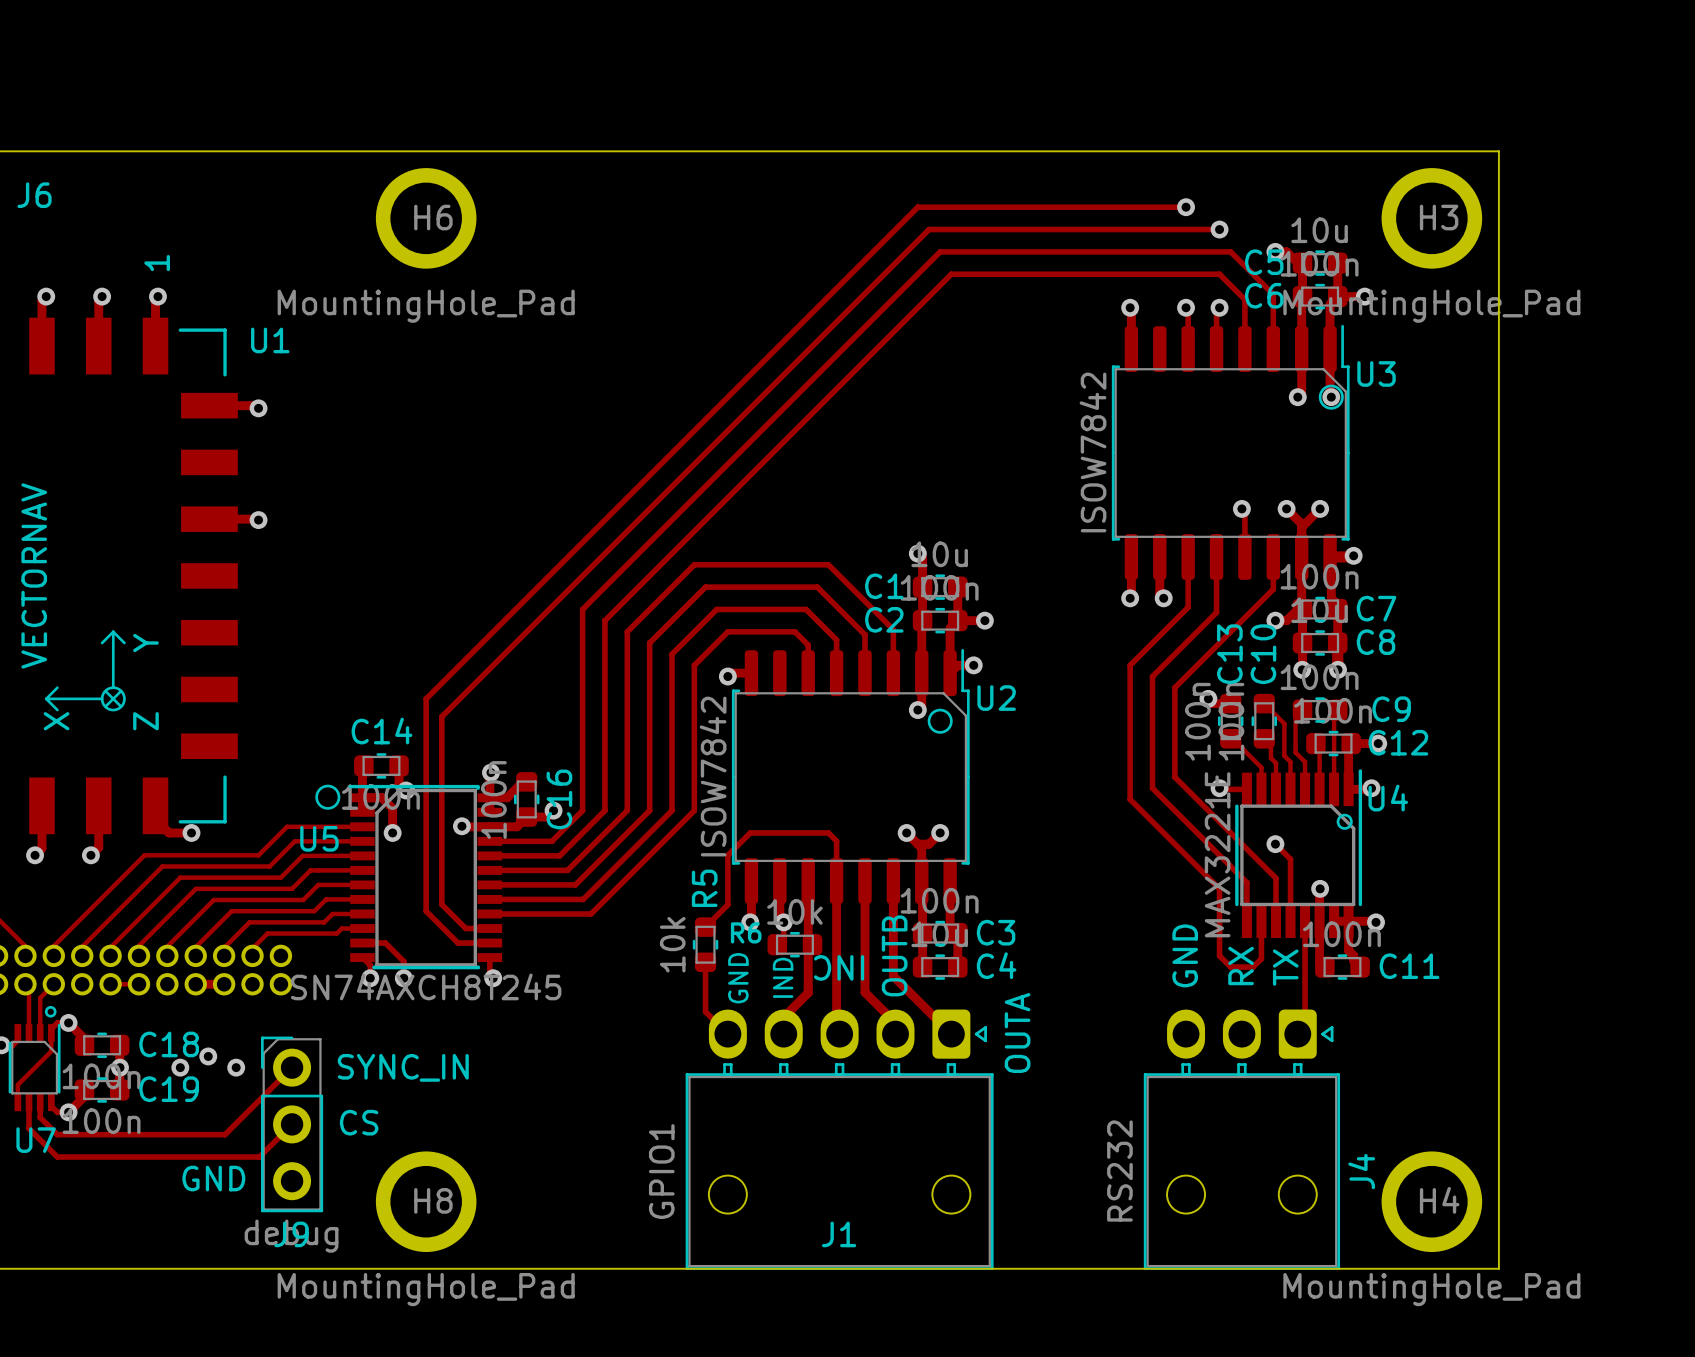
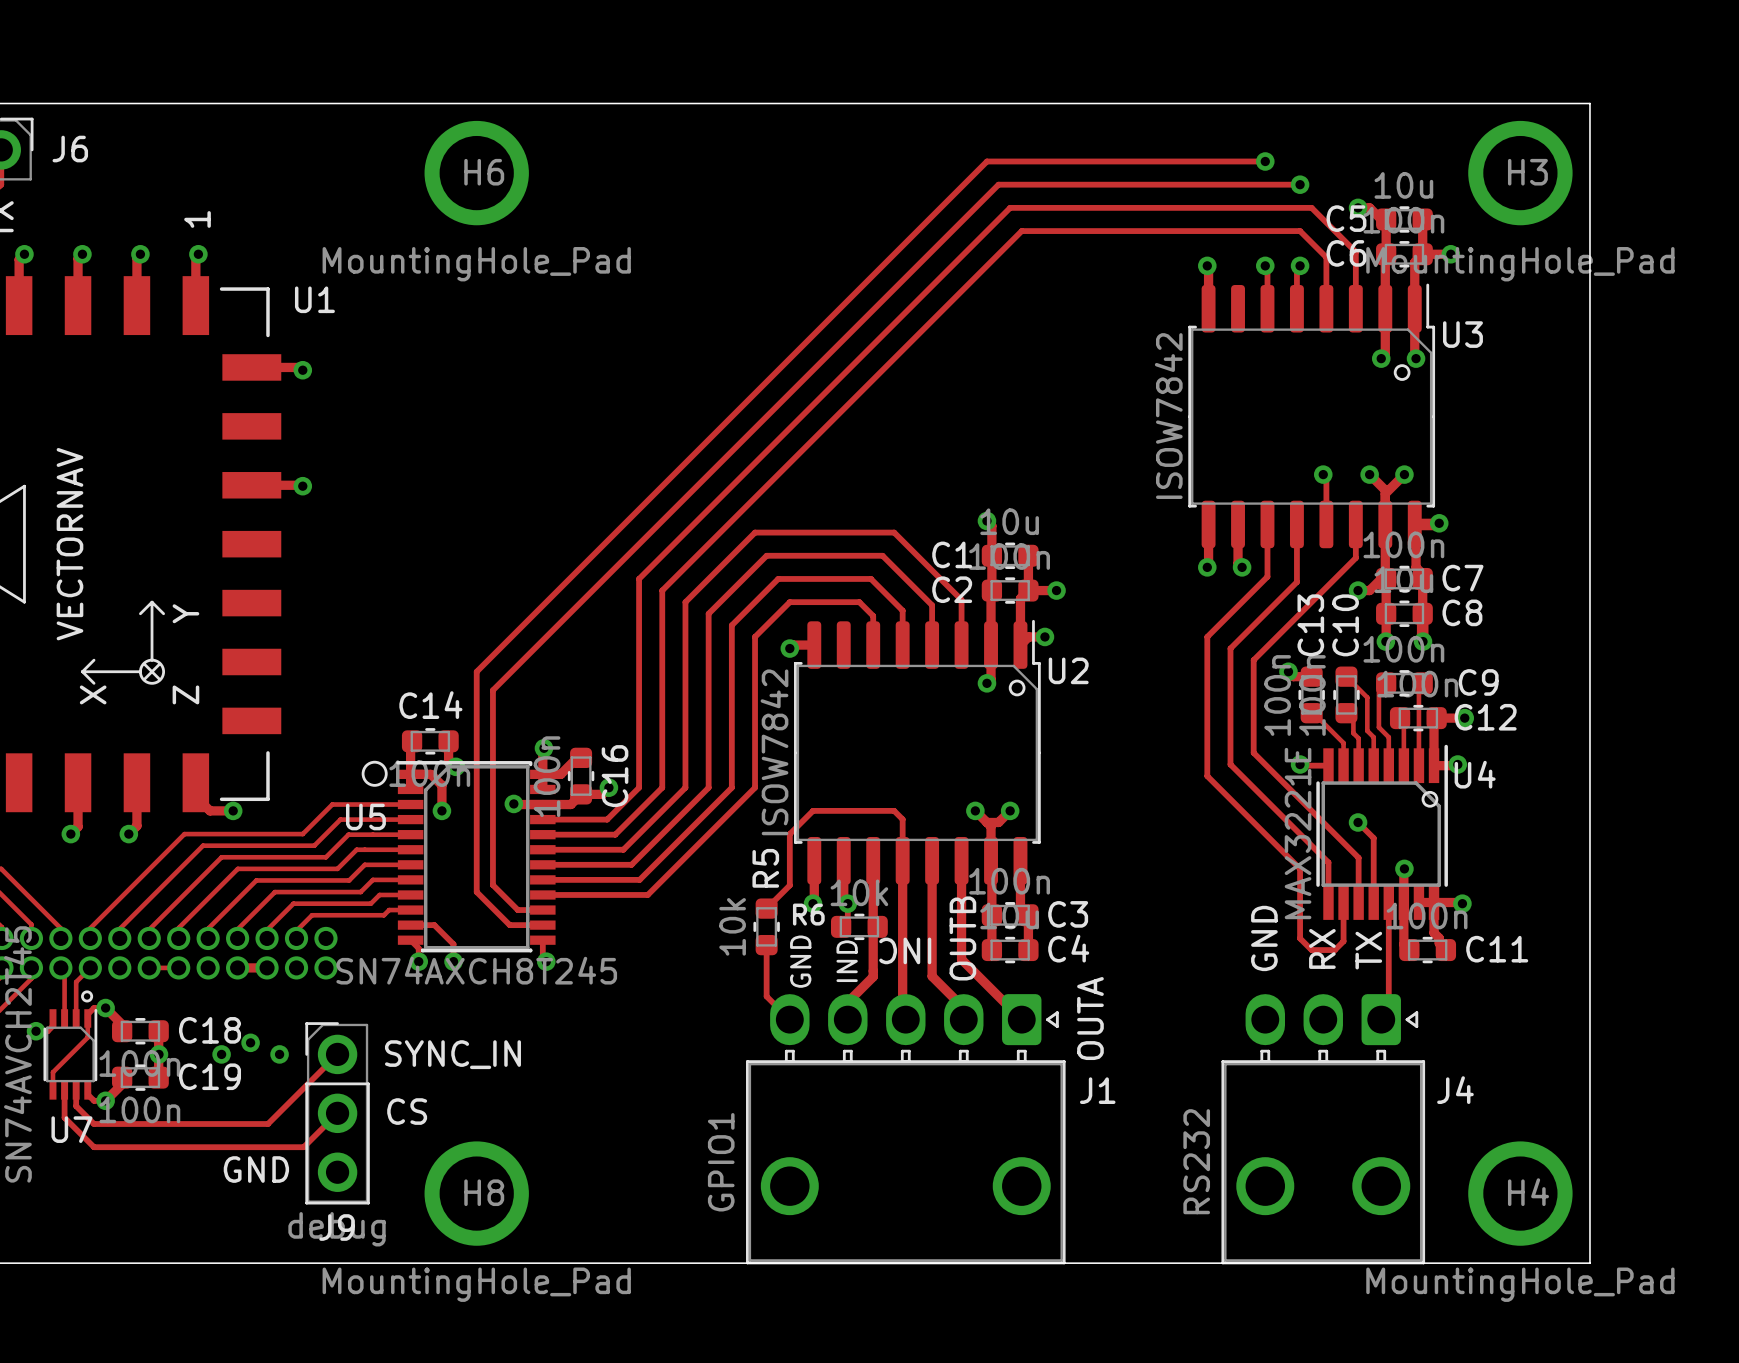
drawing shape: [1318, 384, 1344, 410] -> [1393, 364, 1411, 381]
drawing shape: [927, 708, 953, 734] -> [1008, 679, 1026, 697]
J1 footprint: [685, 1009, 994, 1270] -> [745, 994, 1066, 1265]
J4 footprint: [1143, 1009, 1341, 1270] -> [1221, 994, 1426, 1265]
J4 name position: J4 (1361, 1171) -> J4 (1455, 1090)
J1 name position: J1 (839, 1234) -> J1 (1097, 1090)

